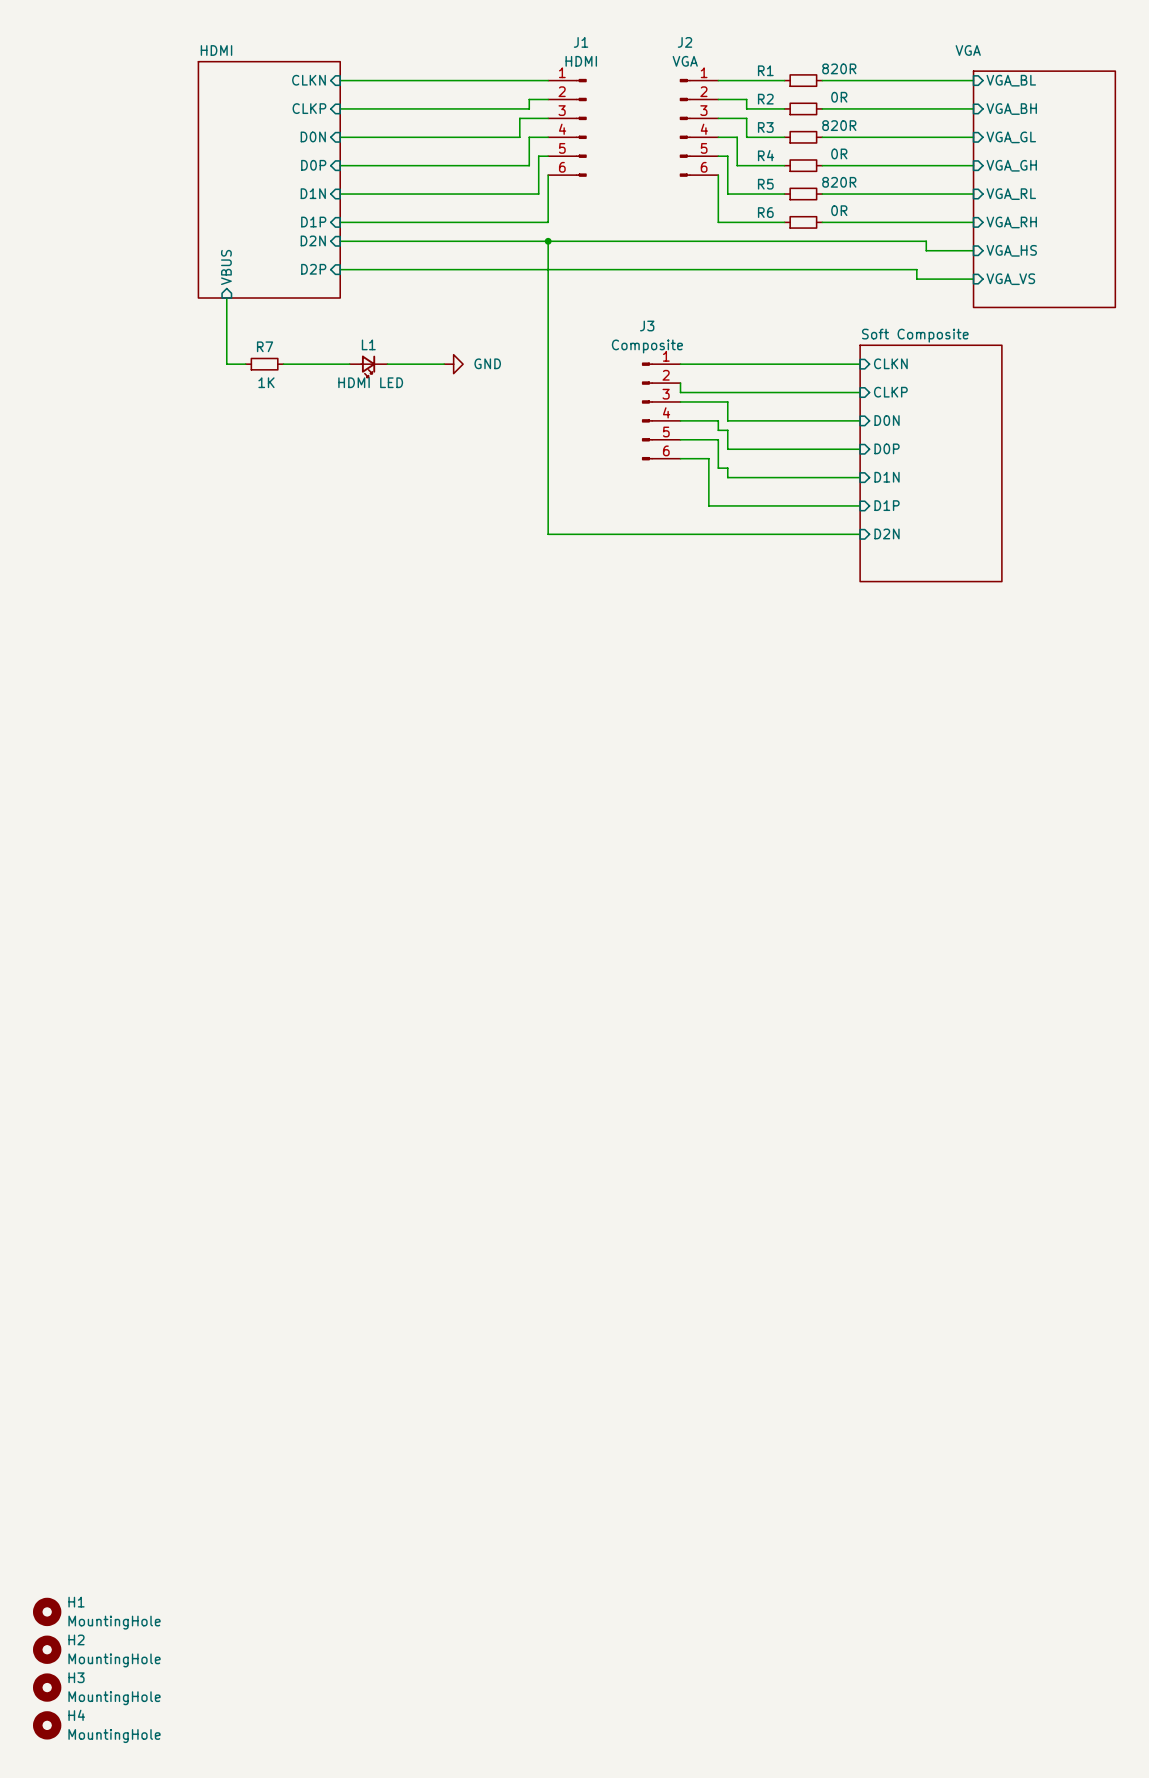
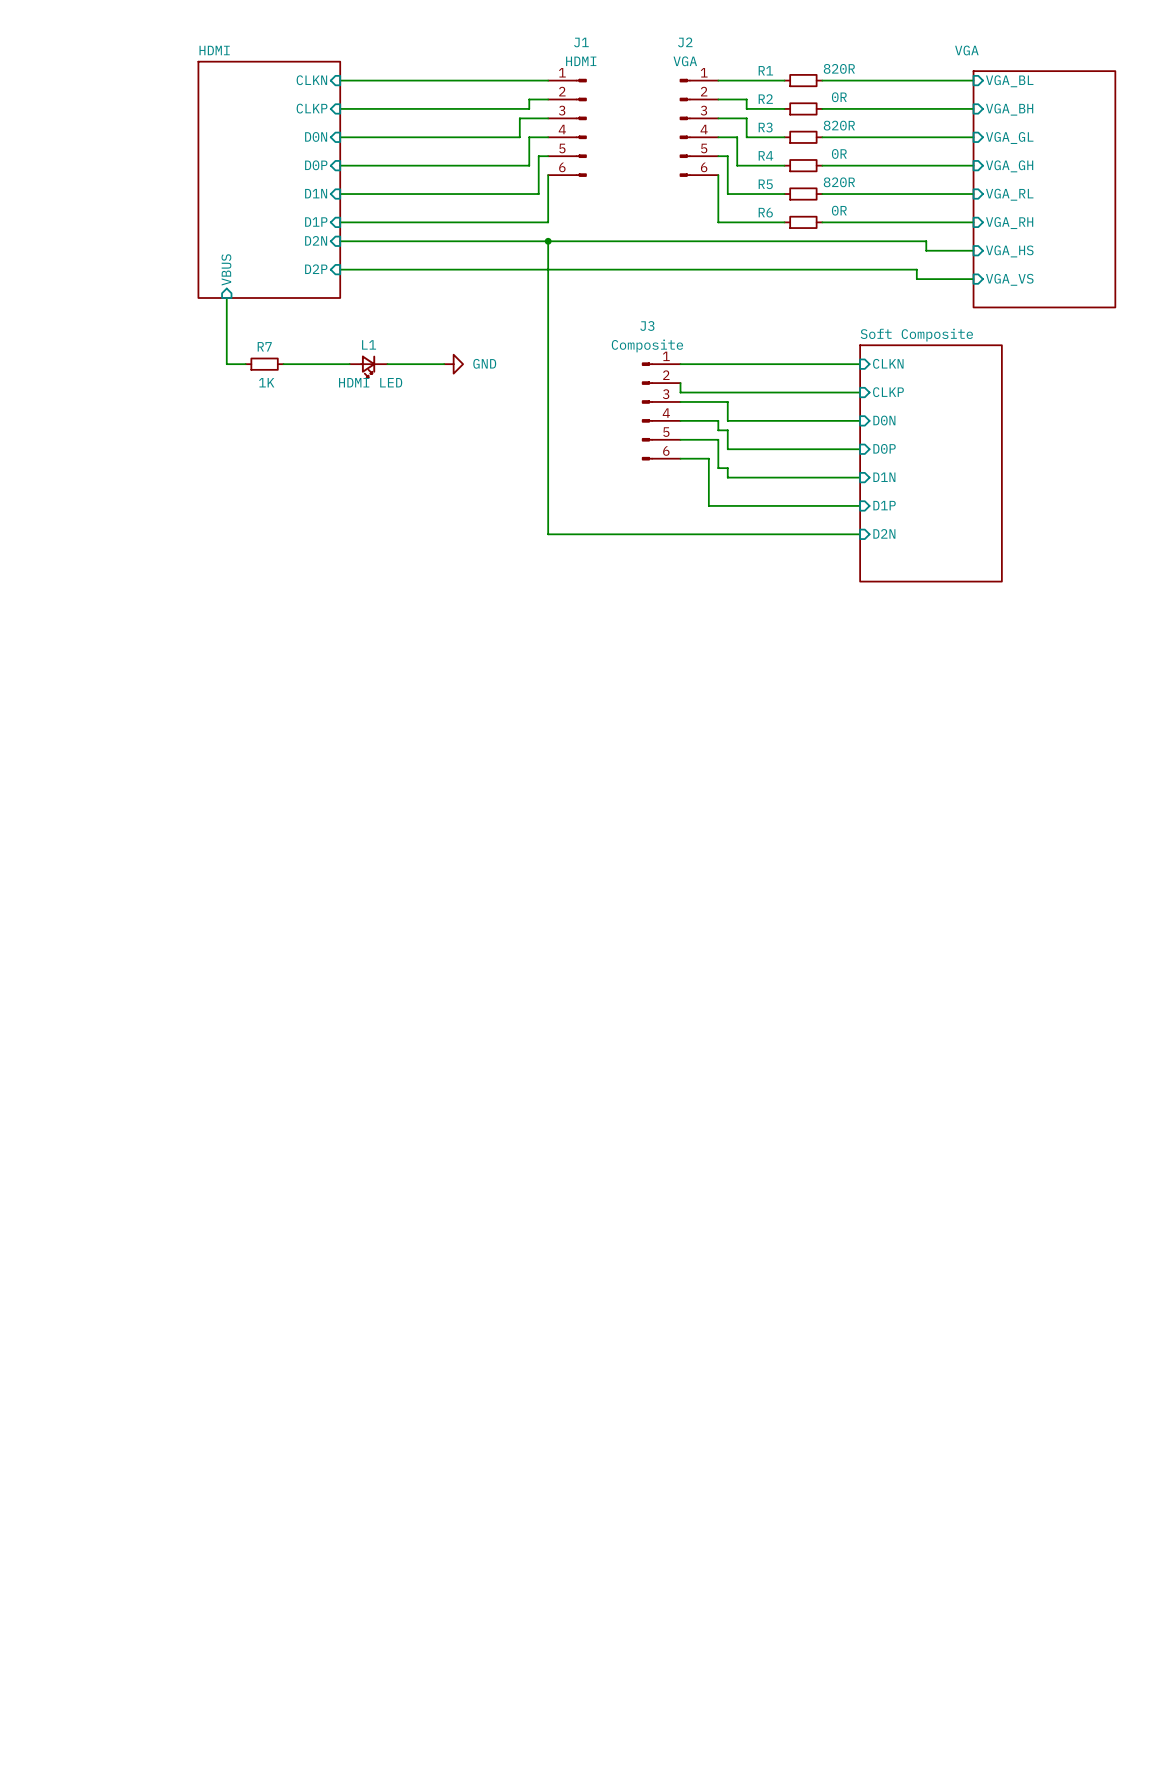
H1: MountingHole (47, 1611) -> none
H2: MountingHole (47, 1649) -> none
H3: MountingHole (47, 1687) -> none
H4: MountingHole (47, 1725) -> none

